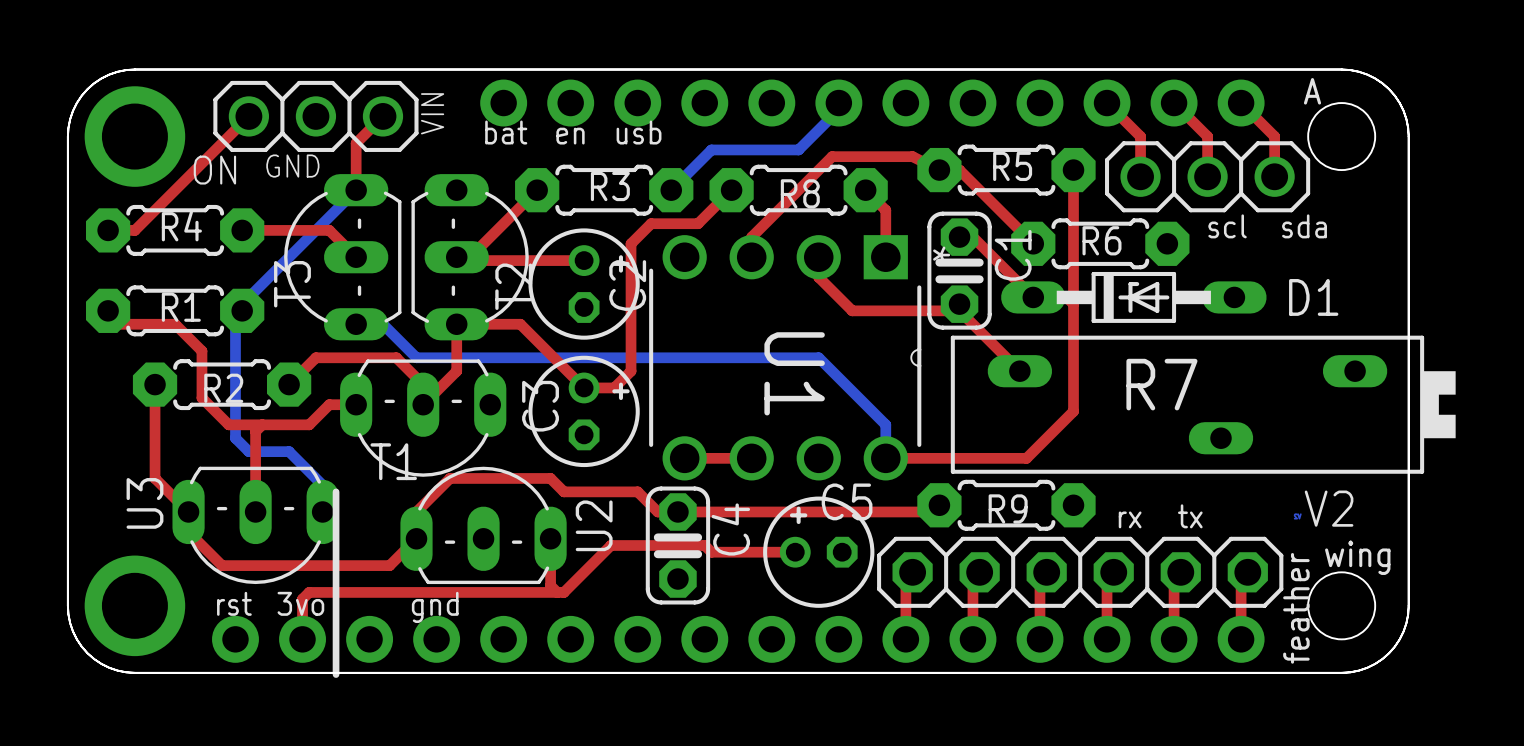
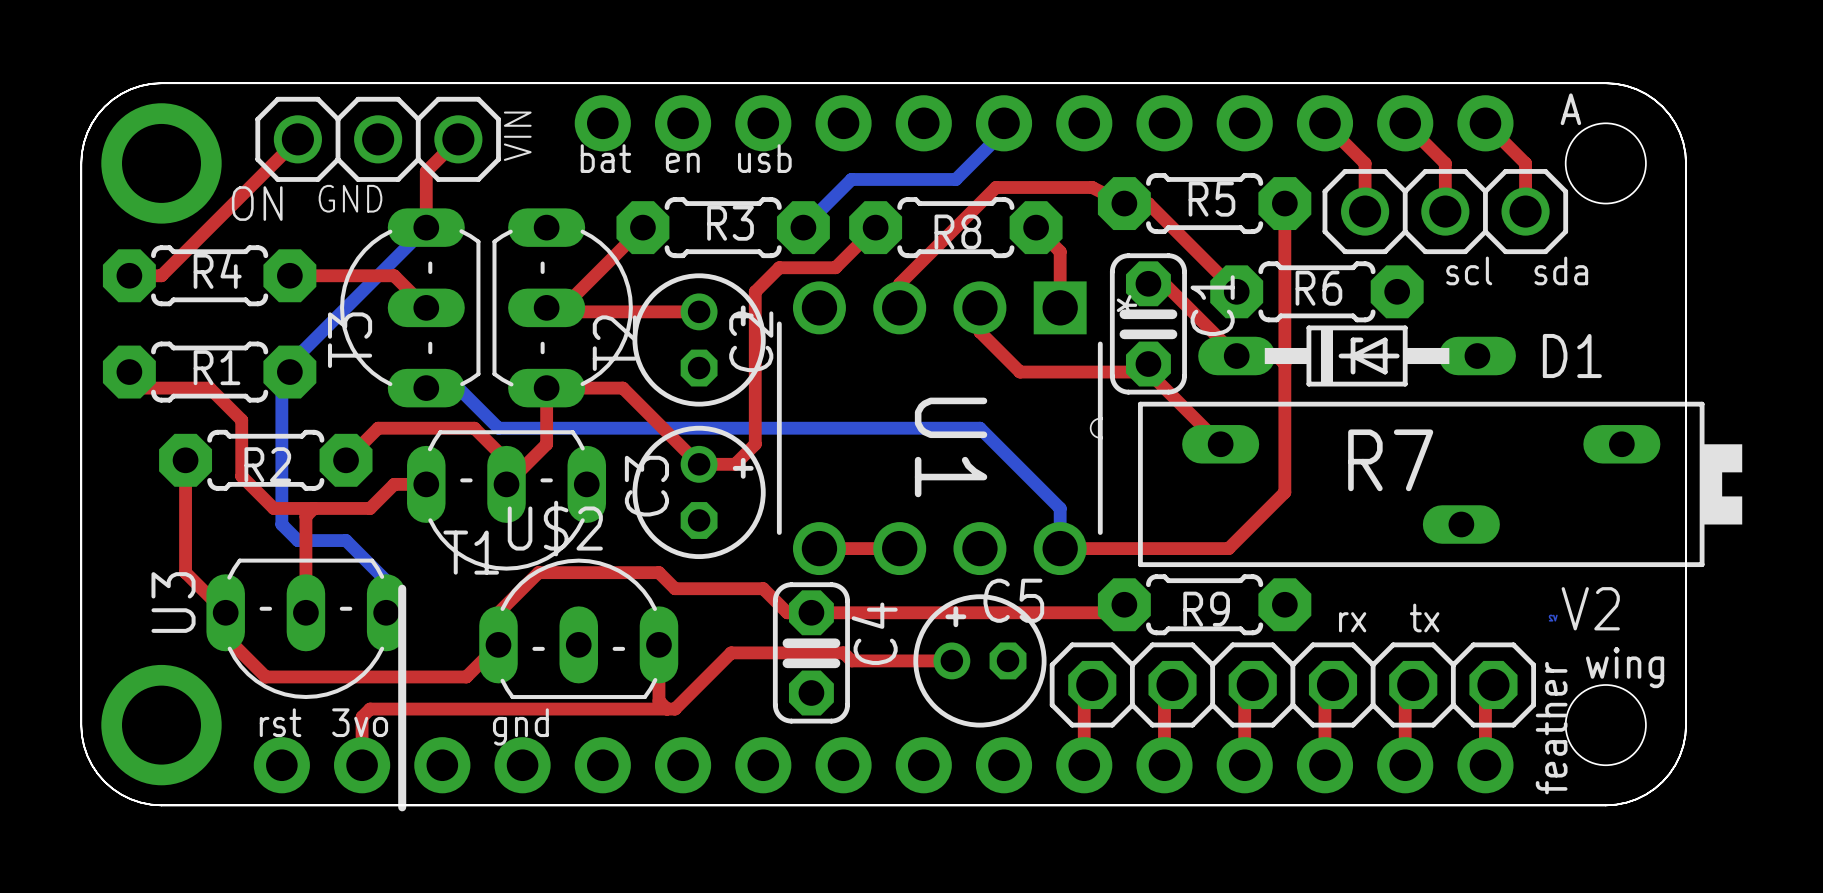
U2 name: U2 (594, 525) -> U$2 (555, 528)

